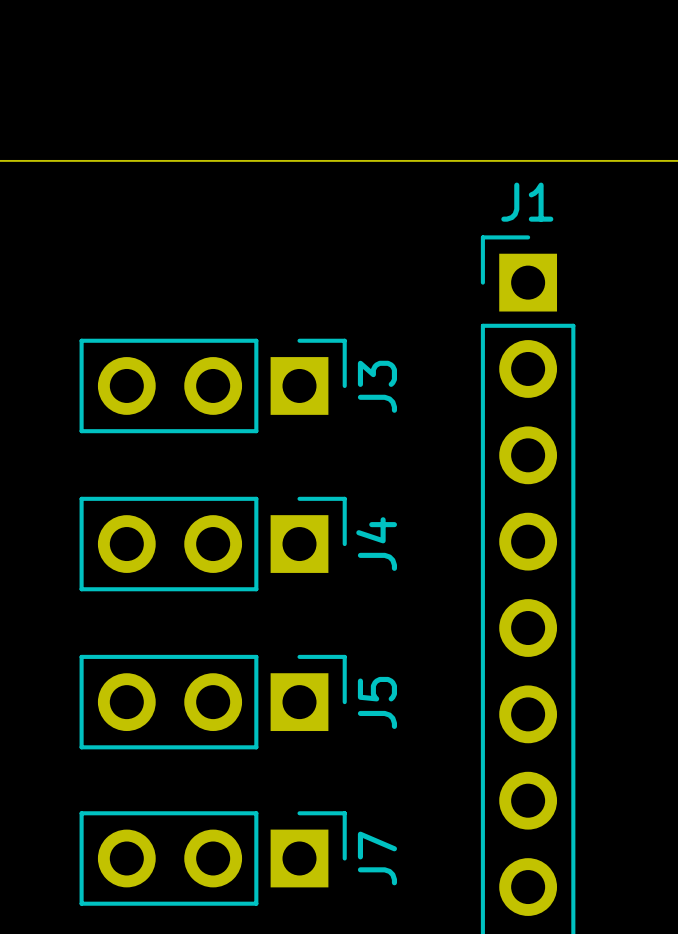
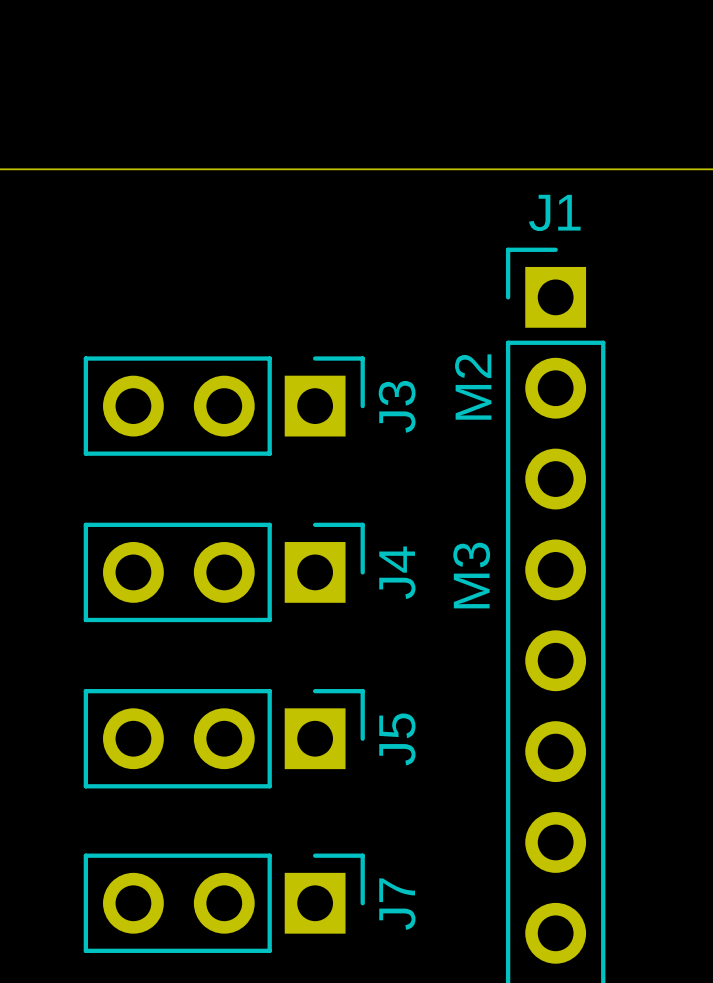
text: none -> M2 (473, 387)
text: none -> M3 (471, 575)

